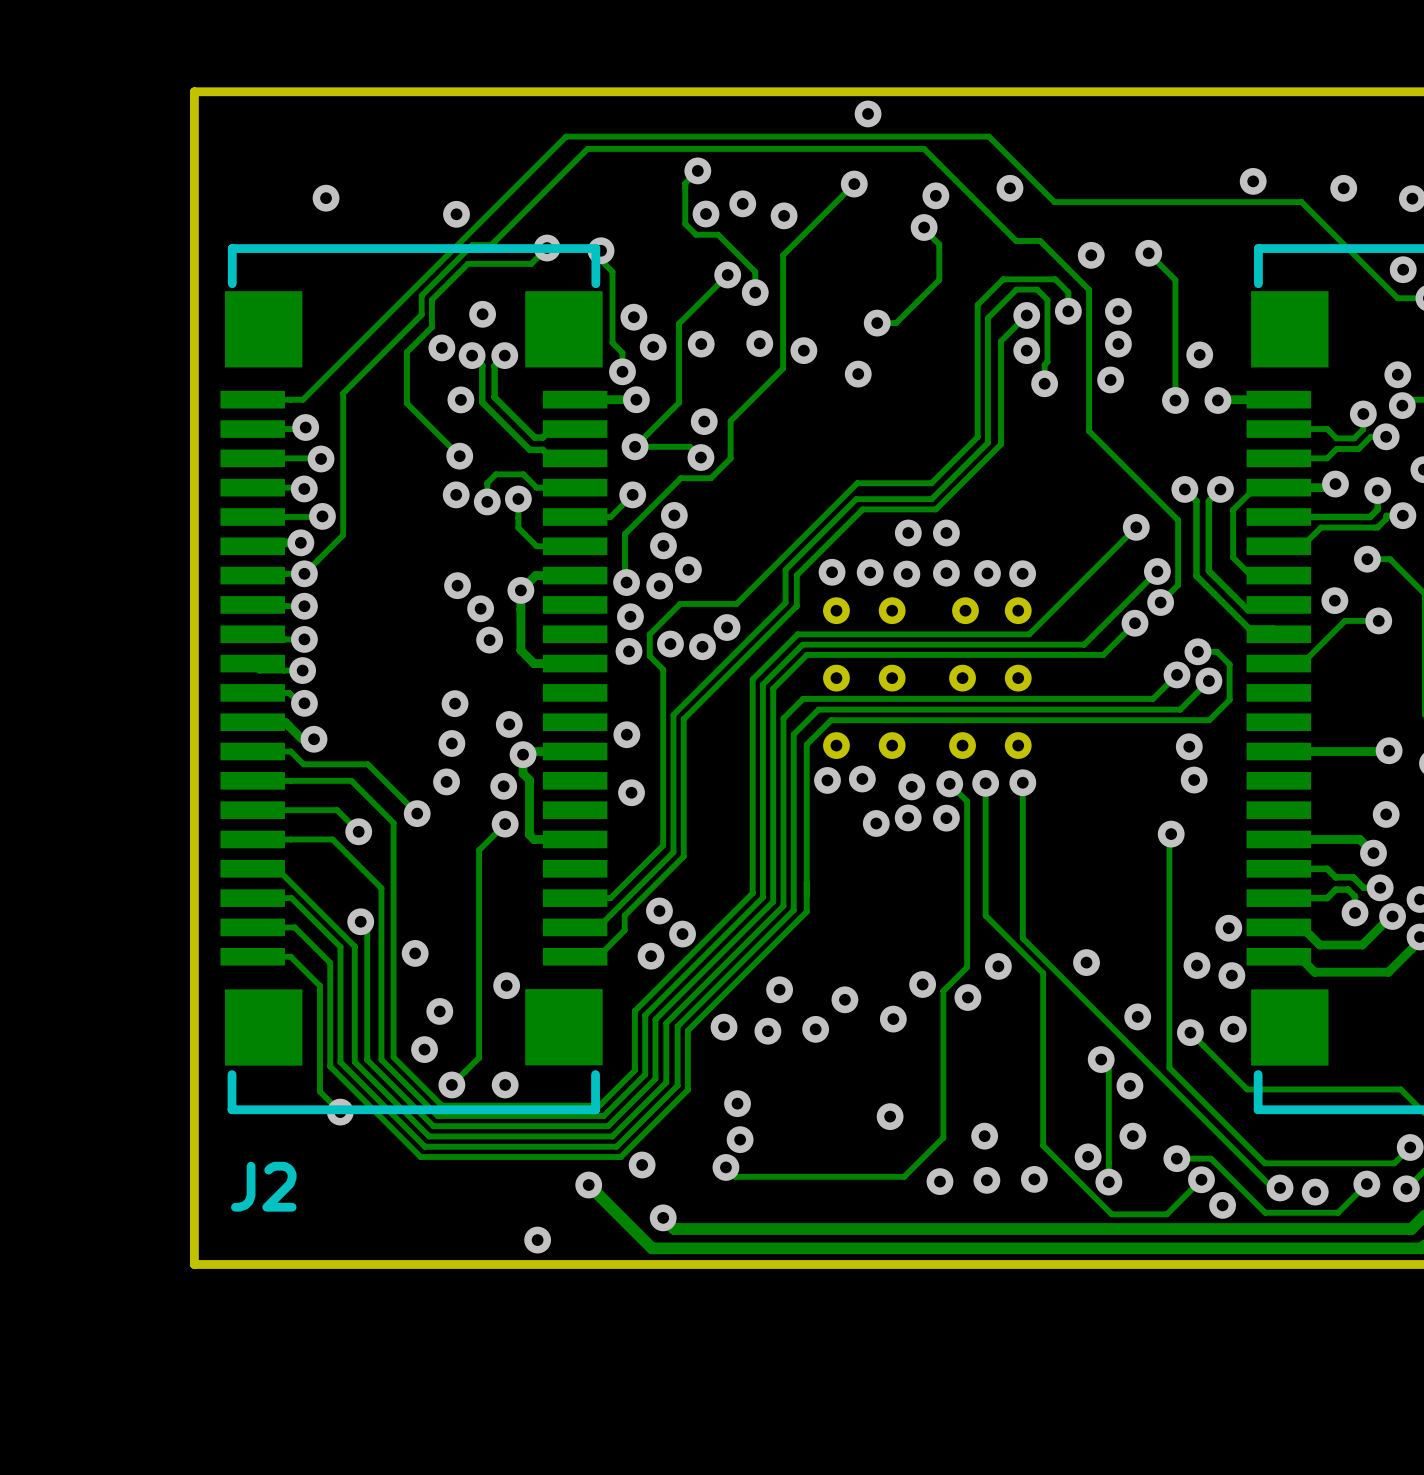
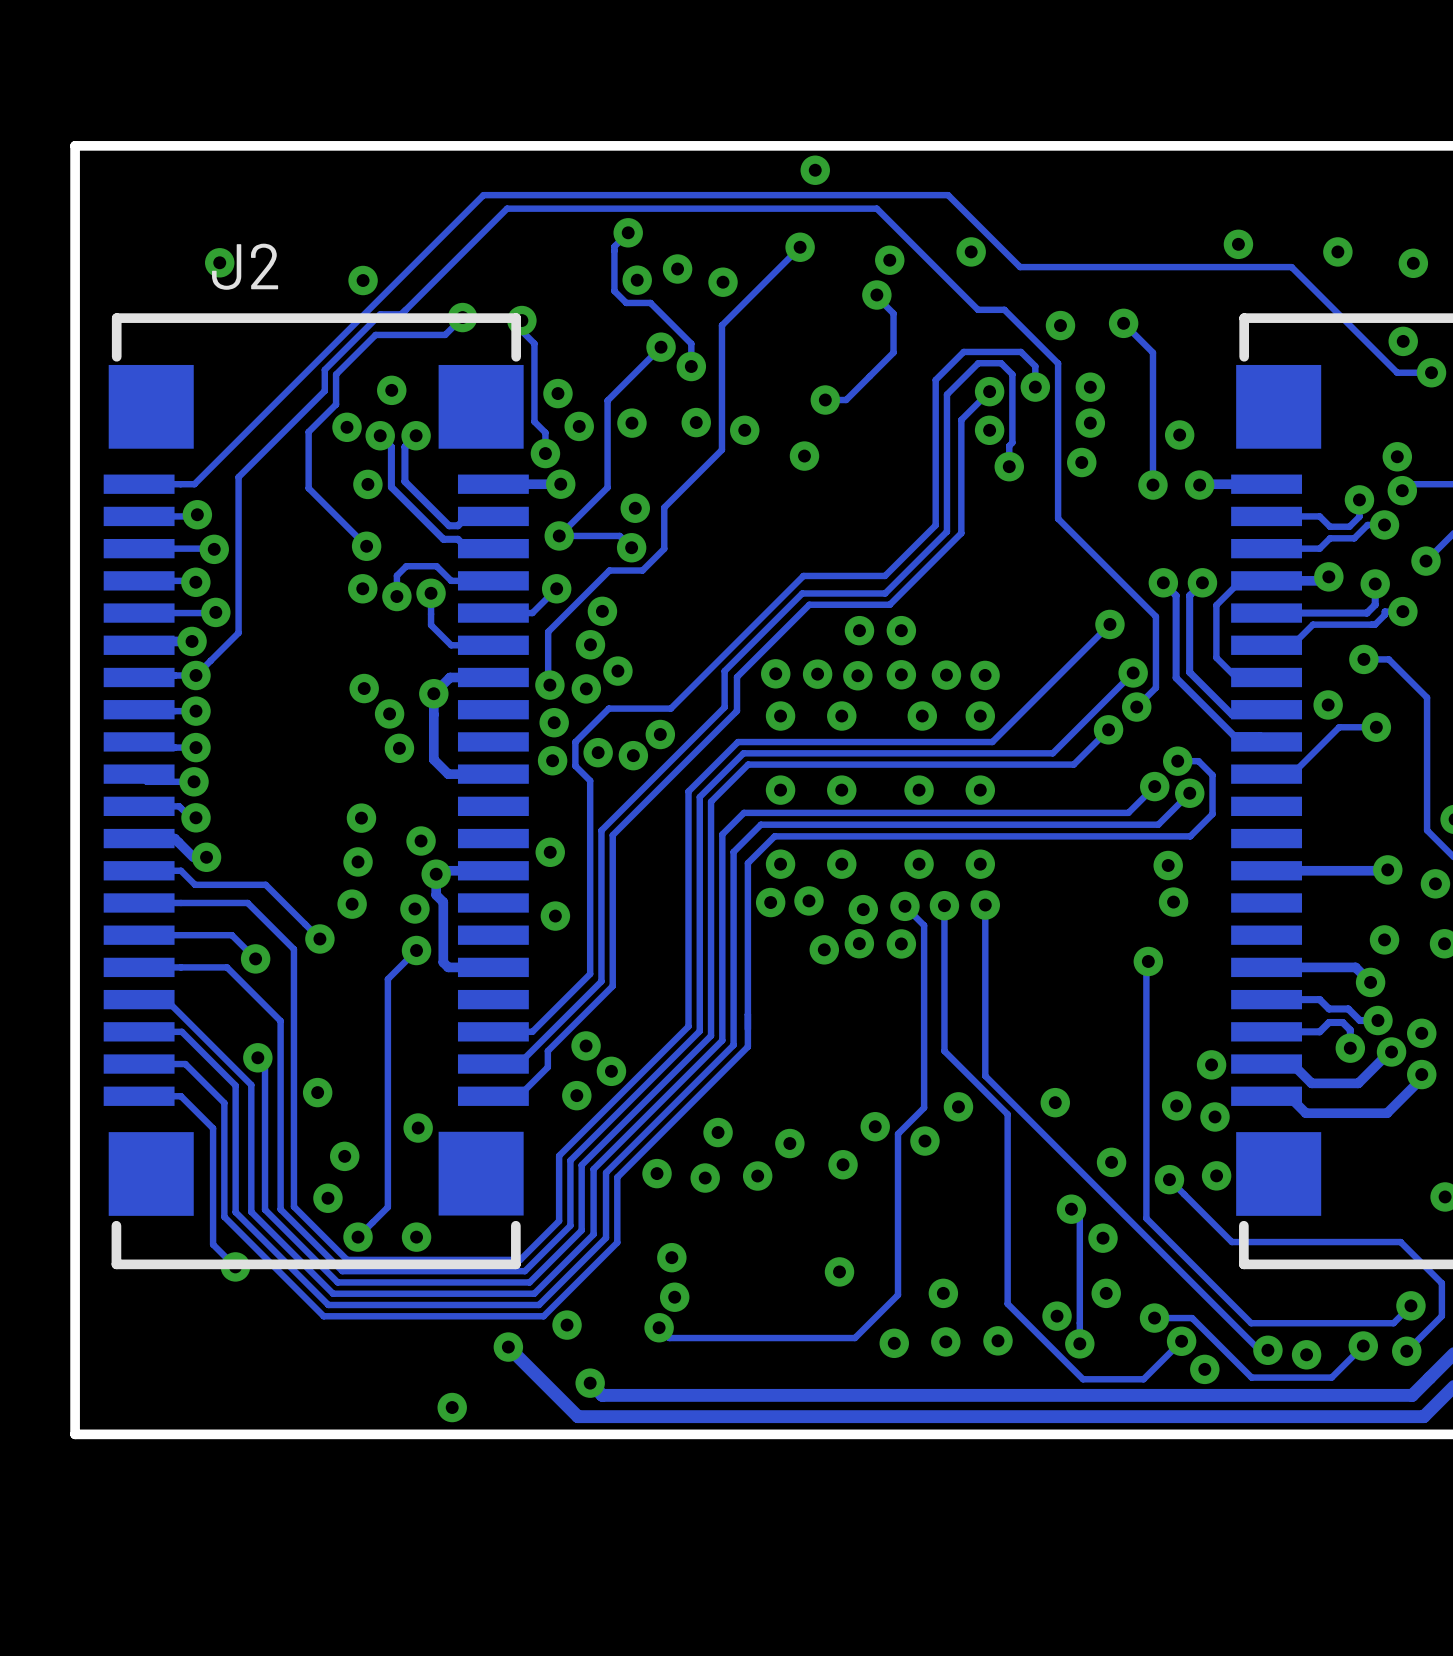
J2 name position: J2 (263, 1186) -> J2 (245, 266)

